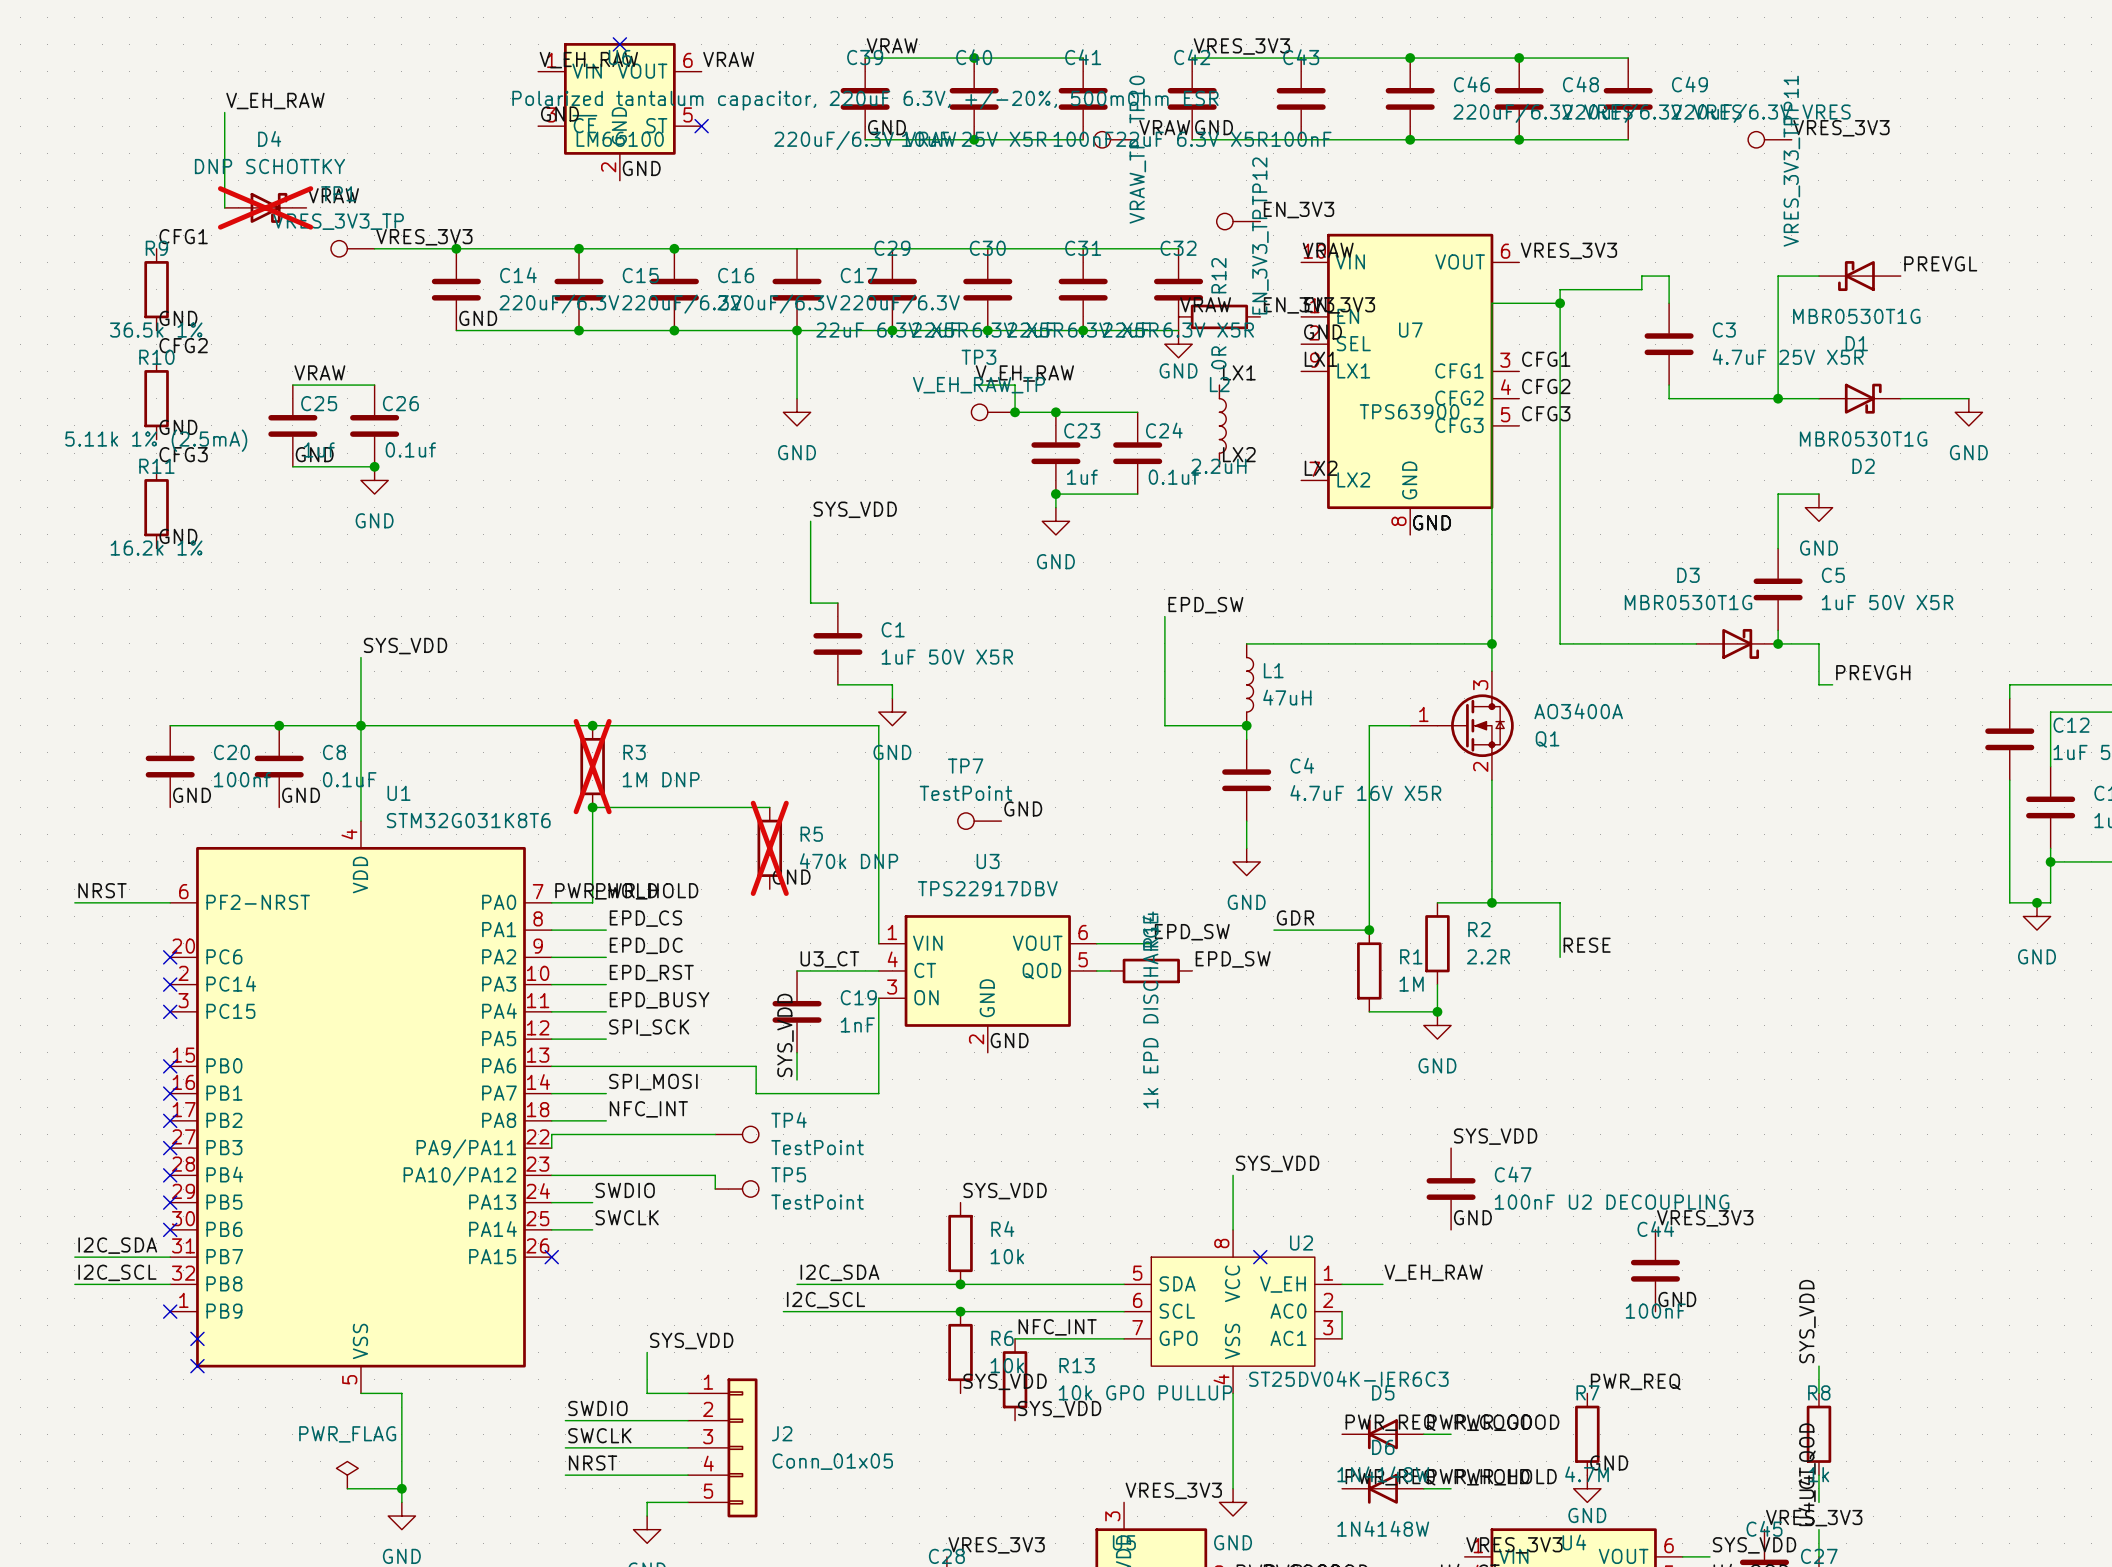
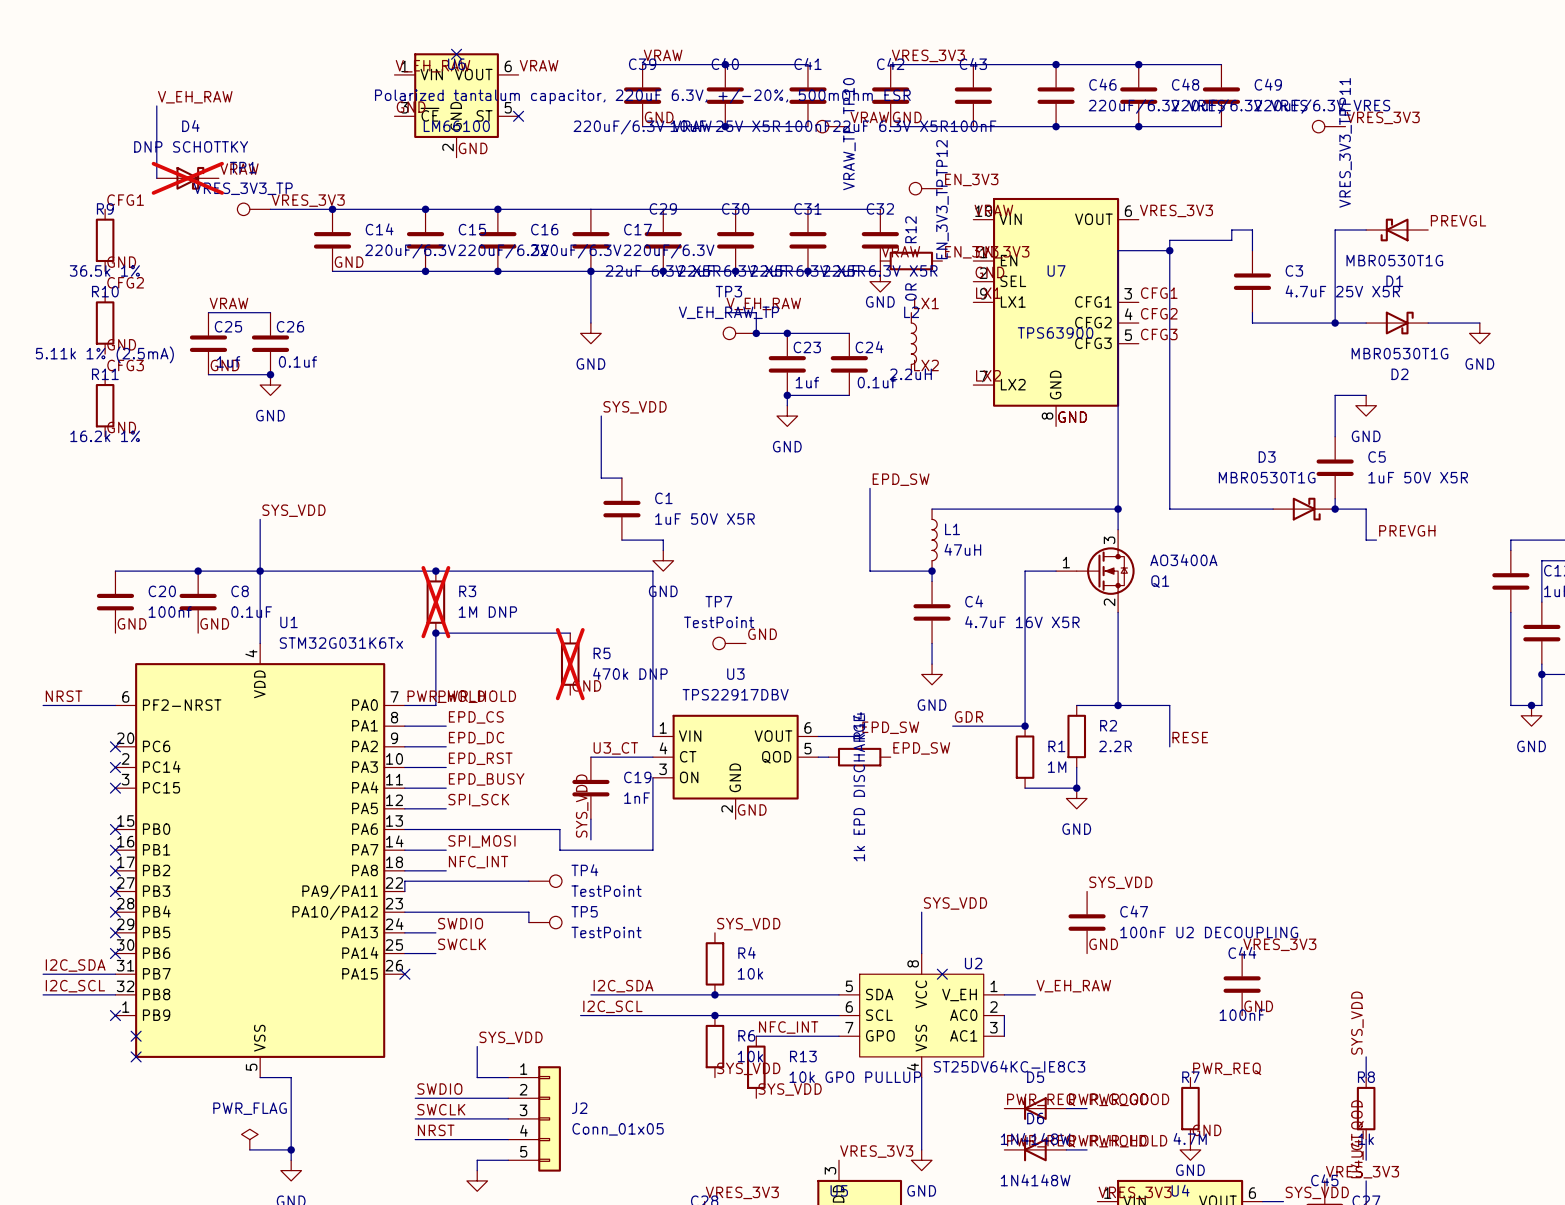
U1 value: STM32G031K8T6 (468, 820) -> STM32G031K6Tx (341, 643)
U2 value: ST25DV04K-IER6C3 (1348, 1378) -> ST25DV64KC-IE8C3 (1009, 1066)

